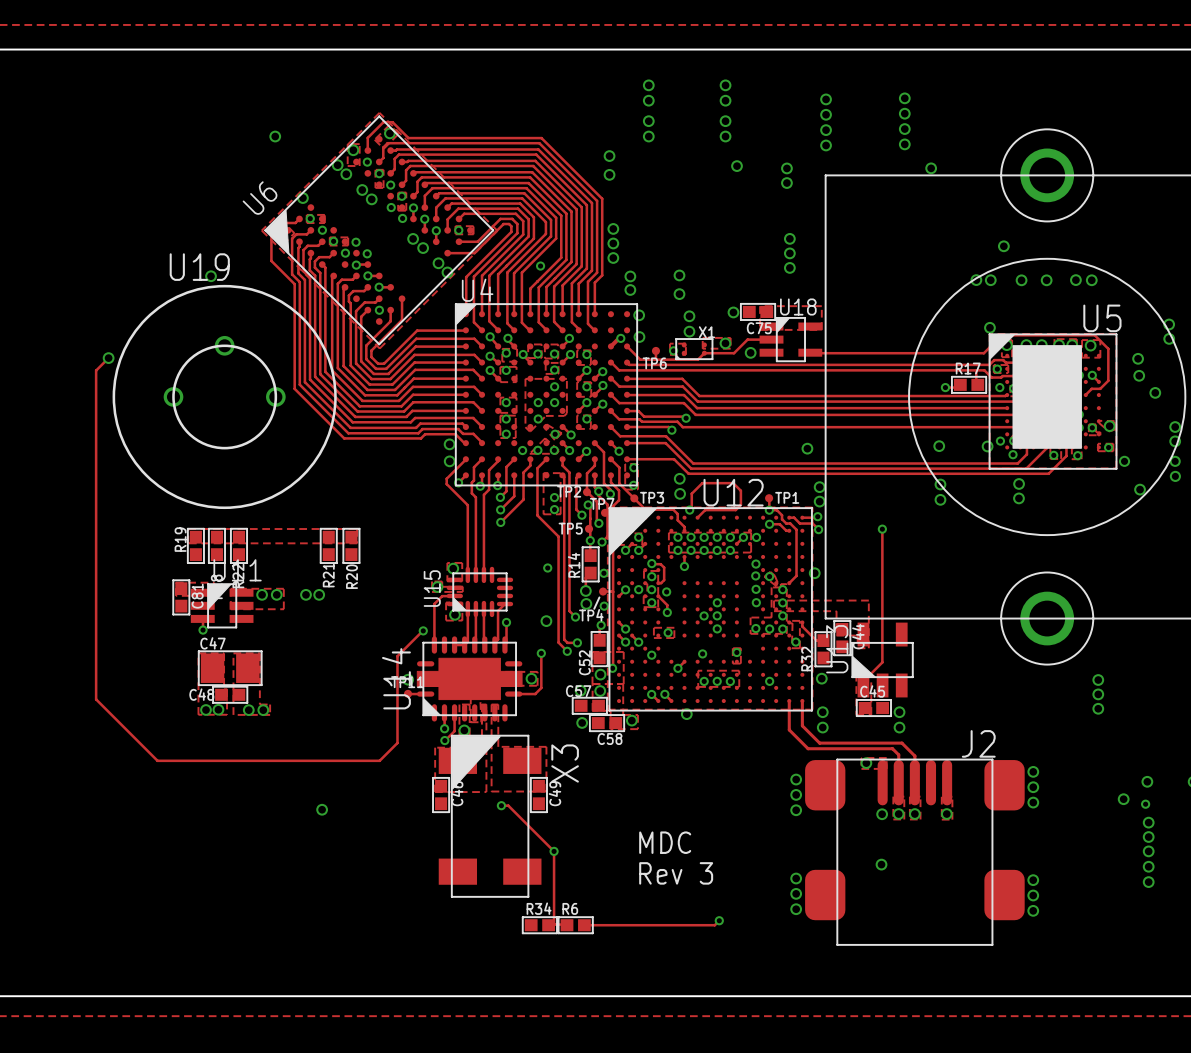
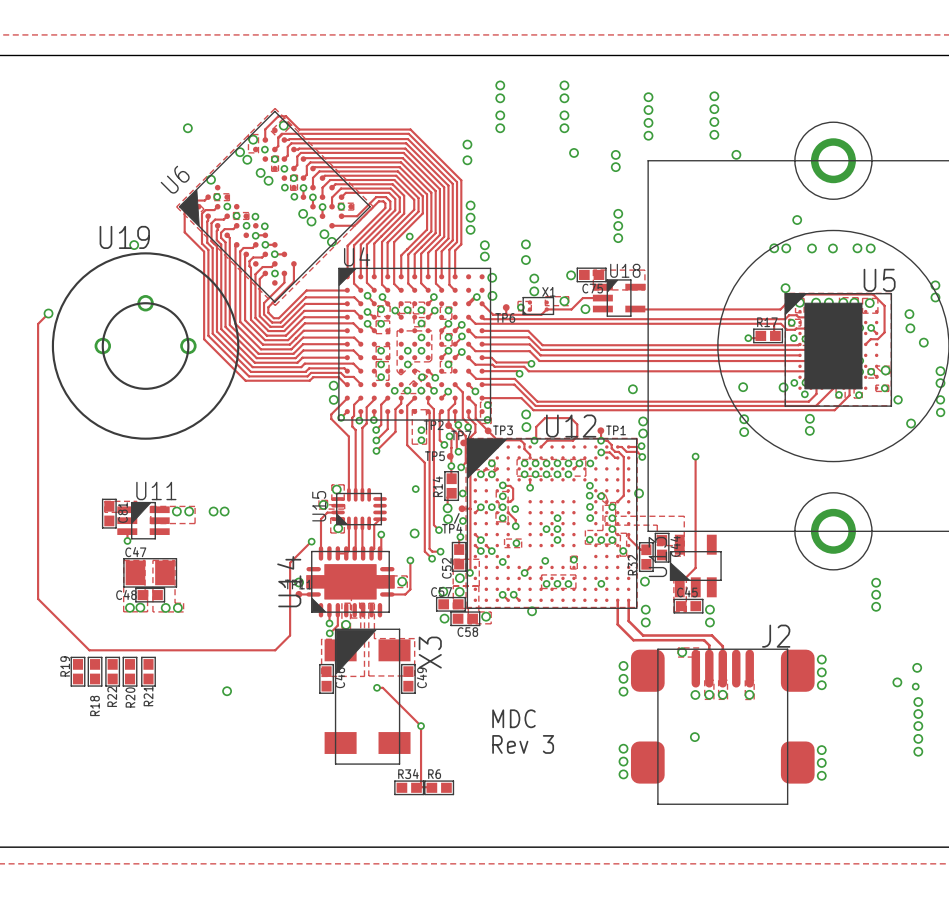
zone outline: (188, 529) (357, 529) (357, 543) (188, 543) (188, 529) -> none
R19 position: (195, 545) -> (78, 671)
R18 position: (216, 545) -> (95, 671)
R22 position: (238, 545) -> (112, 671)
R21 position: (328, 545) -> (148, 671)
R20 position: (351, 545) -> (130, 671)
track: (719, 920) (714, 925) (584, 925) -> none
via: (719, 920) -> none

